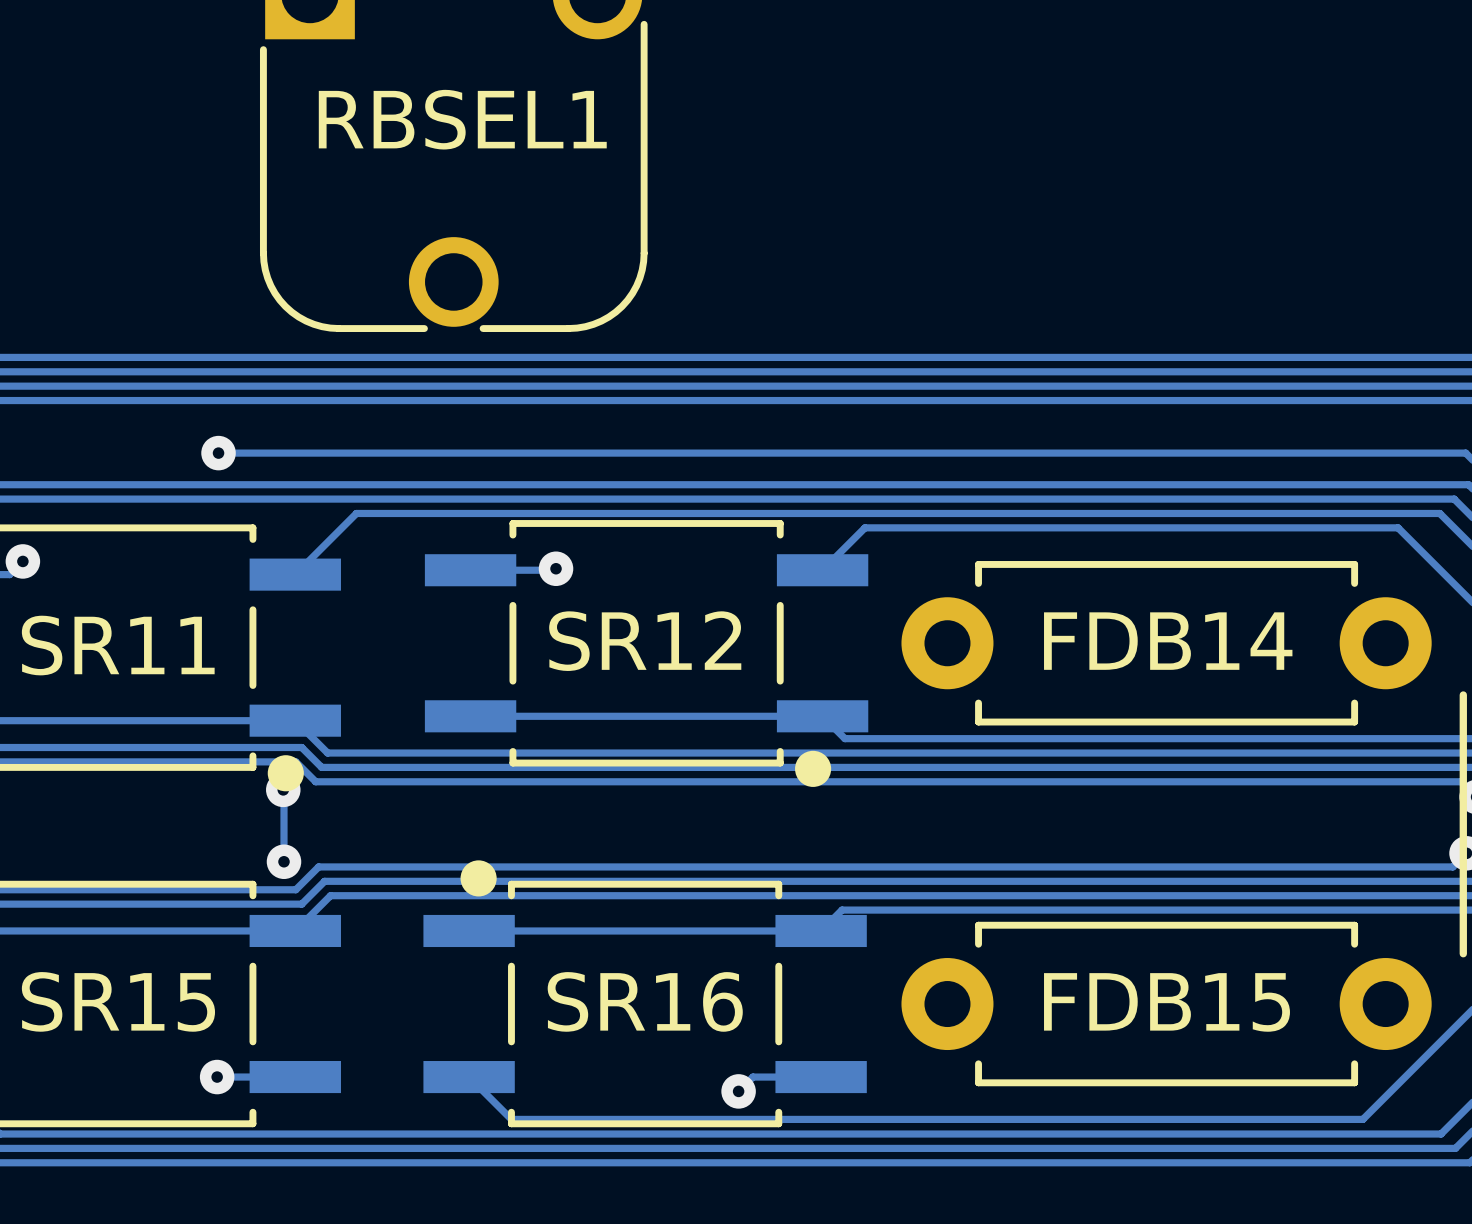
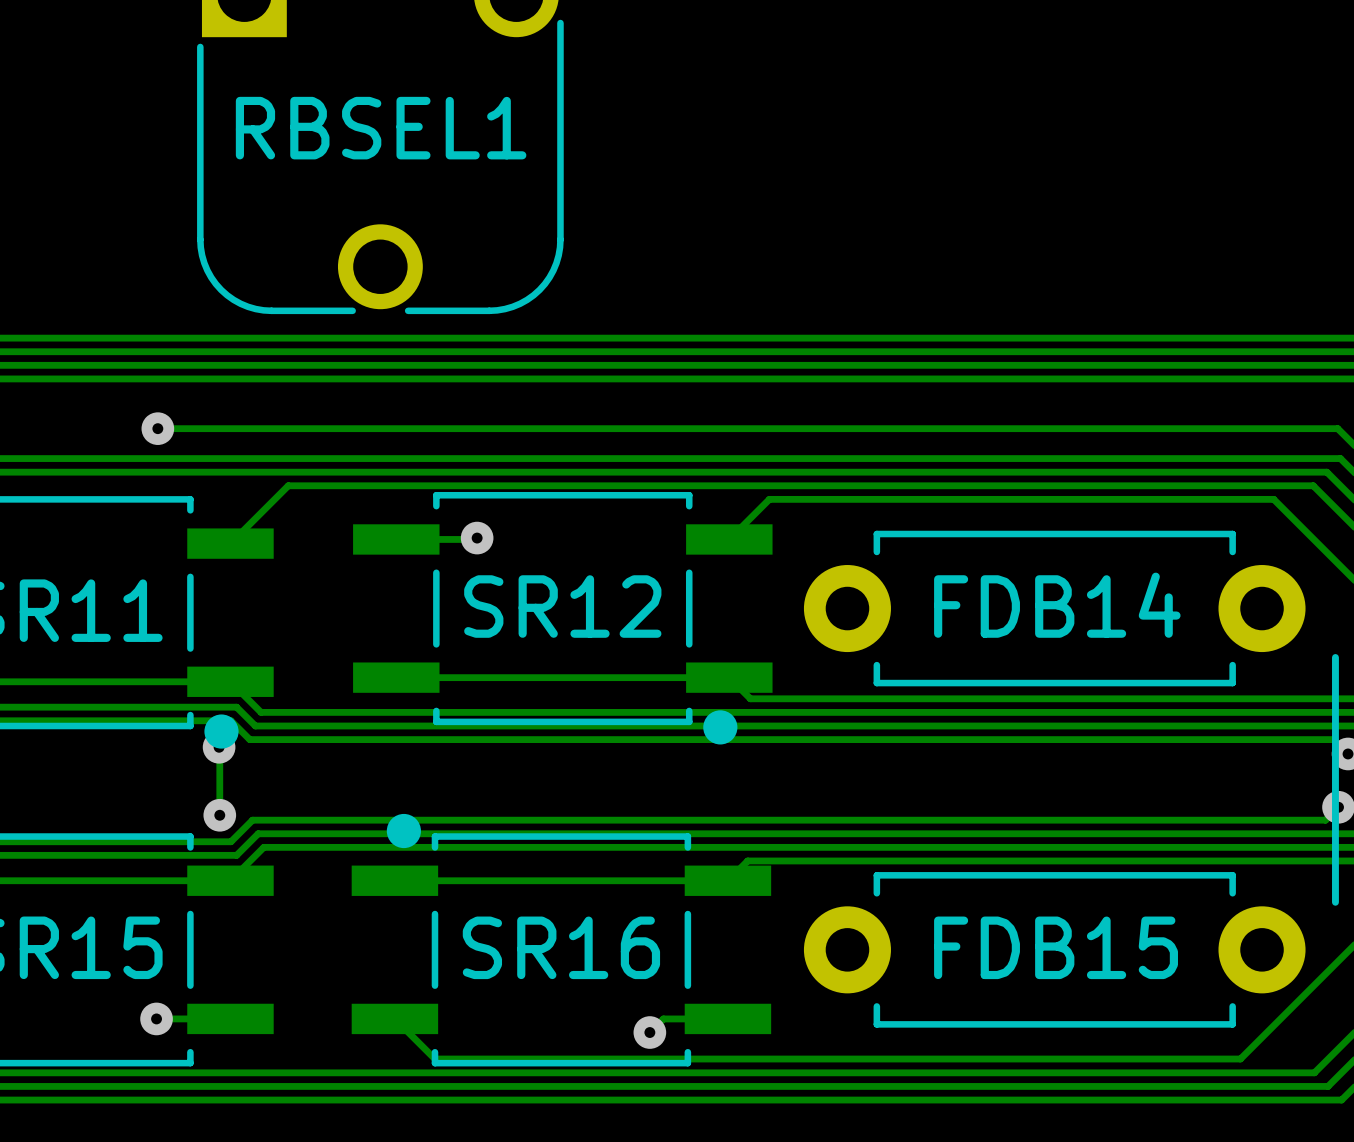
RBSEL1 name position: RBSEL1 (462, 119) -> RBSEL1 (381, 128)

